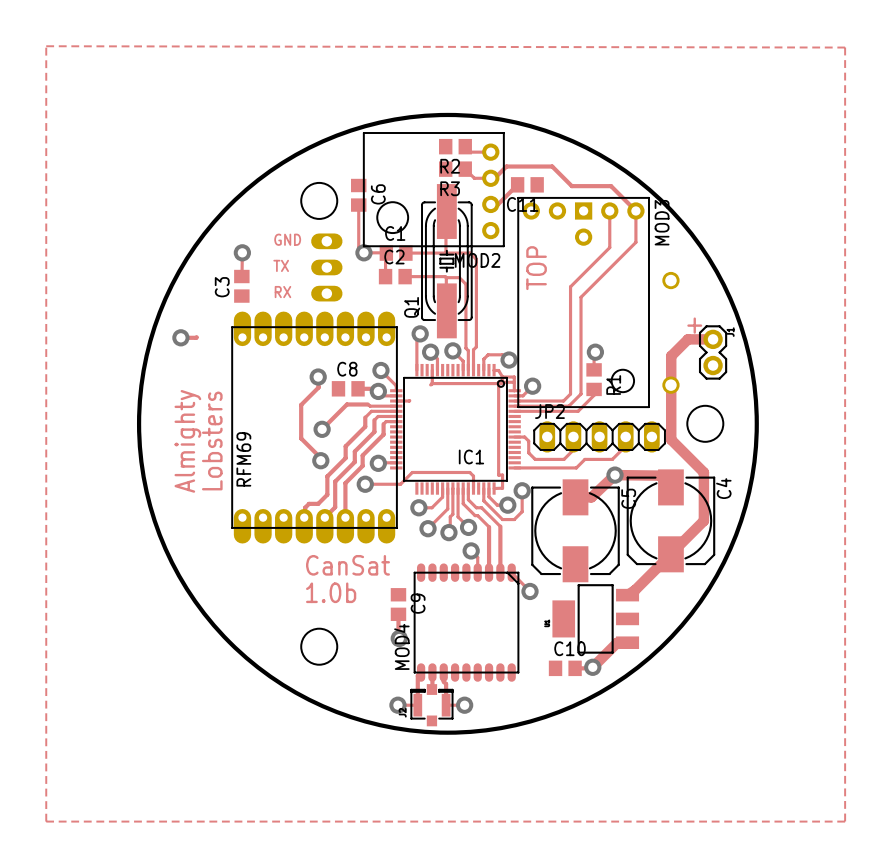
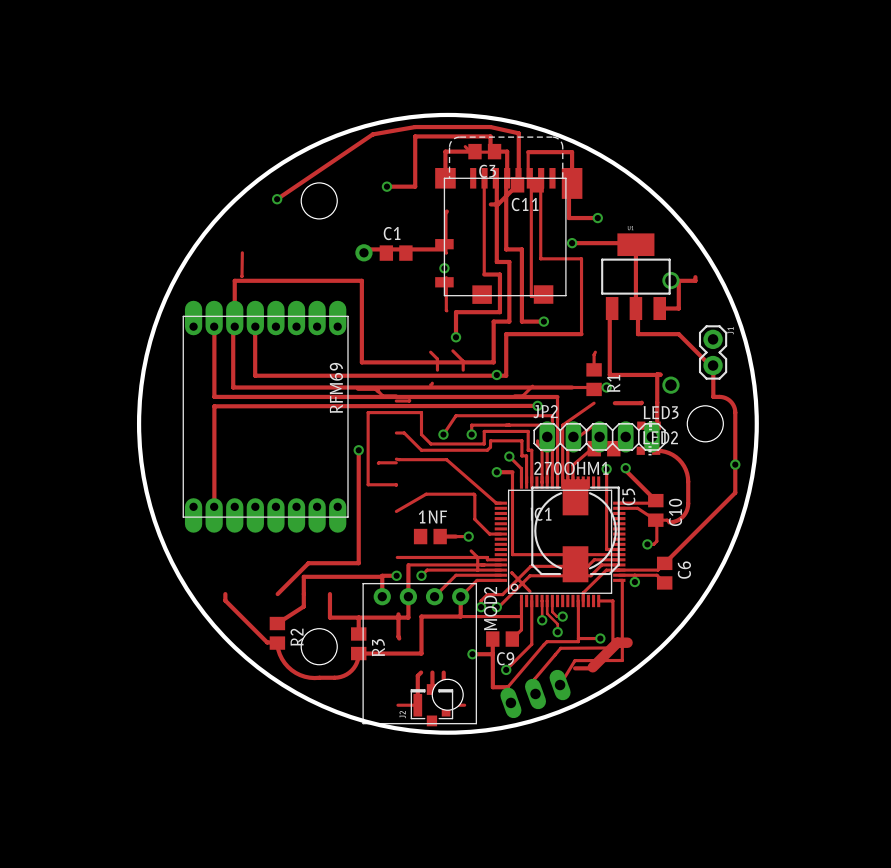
zone outline: (46, 46) (46, 821) (845, 821) (845, 47) (46, 46) -> none
R2 rotation: 0° (455, 146) -> 90° clockwise (277, 633)
R2 position: (455, 146) -> (277, 633)
track: none -> (474, 151) (445, 151) (445, 178) (443, 178)
R2 name position: R2 (450, 166) -> R2 (297, 637)
R3 rotation: 0° (455, 169) -> 90° clockwise (358, 643)
R3 position: (455, 169) -> (358, 643)
track: (465, 169) (474, 178) (484, 178) -> none
track: (484, 178) (494, 178) (506, 166) (552, 166) (571, 186) (611, 186) (635, 210) (635, 242) (581, 297) (581, 394) (568, 406) (514, 406) -> (484, 178) (484, 274) (499, 274) (499, 312) (456, 312) (456, 337)
track: none -> (495, 178) (496, 261) (509, 261) (509, 321) (493, 321) (493, 362) (361, 362) (361, 280) (234, 280) (233, 387) (606, 387)
track: none -> (518, 178) (518, 133) (490, 127) (415, 127) (372, 134) (277, 199)
track: none -> (541, 178) (540, 258) (581, 258) (581, 334) (506, 334) (506, 375) (255, 375) (255, 326)
track: none -> (386, 186) (415, 186) (415, 136) (490, 136) (490, 151) (507, 151) (506, 249) (521, 249) (521, 321) (543, 321)
via: none -> (386, 186)
R3 name position: R3 (450, 188) -> R3 (378, 647)
MOD2 rotation: 0° (433, 189) -> 90° counterclockwise (419, 653)
MOD2 position: (433, 189) -> (419, 653)
C6 position: (358, 195) -> (664, 573)
via: none -> (277, 199)
track: (358, 205) (358, 247) (363, 252) (386, 253) (385, 276) -> none
track: (609, 210) (609, 247) (570, 286) (570, 394) (563, 401) (514, 401) -> none
track: none -> (597, 218) (568, 218) (568, 183) (572, 183) (572, 152) (528, 152) (528, 178) (531, 178) (531, 296) (543, 296) (543, 291)
via: none -> (597, 218)
part: none -> (508, 220)
text: GND (287, 239) -> none
track: none -> (572, 243) (635, 243) (635, 308) (638, 308) (638, 334) (678, 334) (713, 368) (713, 396) (723, 397) (729, 400) (734, 406) (735, 412) (735, 492) (657, 570) (606, 570) (583, 592) (583, 600)
via: none -> (572, 243)
track: none -> (368, 249) (444, 249)
via: (242, 252) -> none
track: (405, 253) (470, 253) (476, 259) (476, 346) (473, 349) (473, 370) -> none
Q1: (446, 261) -> none
text: TX (281, 265) -> none
part: (326, 267) -> none
via: none -> (444, 268)
text: TOP (536, 268) -> none
C2: (395, 276) -> none
track: (405, 276) (459, 277) (465, 284) (465, 348) (468, 350) (468, 370) -> none
track: none -> (695, 277) (695, 280) (678, 280) (678, 308) (659, 308)
C3 rotation: 0° (241, 286) -> 90° clockwise (484, 151)
C3 position: (241, 286) -> (484, 151)
C3 name position: C3 (222, 287) -> C3 (487, 171)
text: RX (282, 292) -> none
MOD3: (583, 302) -> none
track: none -> (612, 308) (609, 308) (609, 374) (660, 374)
via: none -> (543, 321)
text: + (694, 325) -> none
track: none -> (214, 326) (214, 396) (557, 397) (557, 482)
track: (180, 332) (180, 337) (196, 337) -> none
track: (420, 333) (416, 338) (416, 370) -> none
via: (420, 333) -> none
via: (180, 337) -> none
via: none -> (456, 337)
track: (713, 339) (687, 339) (671, 356) (670, 385) -> none
via: (452, 350) -> none
via: (430, 352) -> none
via: (595, 352) -> none
track: (509, 360) (502, 354) (488, 354) (483, 359) (483, 370) -> none
via: (509, 360) -> none
track: (380, 370) (396, 385) (396, 390) -> none
via: (380, 370) -> none
track: (432, 370) (431, 383) (502, 383) (502, 377) -> none
track: (494, 370) (498, 370) (502, 377) -> none
via: none -> (496, 374)
track: none -> (660, 374) (657, 374) (656, 450)
track: (318, 377) (318, 387) (301, 404) (301, 438) (319, 456) (320, 460) -> none
via: (318, 377) -> none
track: (502, 377) (514, 377) (514, 390) -> none
track: (514, 382) (498, 382) (498, 475) (502, 475) (502, 488) (494, 488) -> none
track: (671, 385) (671, 439) (703, 472) (703, 520) (635, 589) (627, 595) -> none
via: (532, 386) -> none
via: none -> (606, 387)
C8: (348, 388) -> none
track: (594, 389) (594, 395) (578, 411) (514, 411) -> none
via: (378, 391) -> none
track: none -> (641, 402) (614, 403)
track: none -> (594, 403) (562, 425) (562, 482)
track: none -> (537, 405) (214, 406) (214, 506)
via: none -> (537, 405)
track: (396, 406) (346, 404) (322, 429) -> none
track: (396, 411) (371, 411) (365, 417) (365, 426) (345, 446) (345, 458) (327, 476) (327, 494) (318, 503) (309, 503) (305, 507) (304, 517) -> none
part: none -> (265, 416)
track: (396, 416) (378, 416) (374, 420) (374, 431) (354, 451) (354, 462) (335, 481) (335, 507) (324, 517) -> none
track: (396, 421) (386, 421) (383, 424) (383, 434) (362, 455) (362, 465) (345, 483) (345, 517) -> none
track: none -> (594, 425) (567, 445) (567, 482)
LED3: none -> (648, 425)
part: (314, 427) -> none
via: (322, 429) -> none
IC1 rotation: 0° (455, 429) -> 180° (560, 541)
IC1 position: (455, 429) -> (560, 541)
track: none -> (396, 432) (404, 432) (421, 450) (487, 450) (490, 447) (490, 440) (521, 440) (521, 455) (526, 455) (526, 482)
track: none -> (443, 434) (456, 415) (552, 415) (552, 482)
via: none -> (443, 434)
track: none -> (471, 434) (471, 425) (547, 425) (547, 482)
via: none -> (471, 434)
track: (573, 436) (573, 450) (564, 459) (535, 459) (528, 452) (528, 441) (524, 437) (514, 437) -> none
track: (625, 436) (625, 446) (612, 459) (584, 459) (576, 467) (514, 467) -> none
text: Lobsters (212, 440) -> none
track: none -> (537, 440) (537, 445) (542, 445) (542, 482)
text: Almighty (187, 441) -> none
track: none -> (594, 447) (572, 465) (572, 482)
270OHM1: none -> (604, 448)
track: none -> (358, 450) (358, 563) (308, 563) (277, 594)
via: none -> (358, 450)
LED2: none -> (648, 450)
track: none -> (656, 450) (672, 454) (684, 466) (687, 477) (688, 503) (685, 513) (678, 519) (669, 522) (667, 520) (655, 520)
track: none -> (509, 456) (521, 468) (521, 482)
via: none -> (509, 456)
track: none -> (396, 459) (446, 459) (496, 503) (500, 503)
via: (320, 460) -> none
via: (378, 463) -> none
via: none -> (735, 464)
track: none -> (625, 468) (625, 470) (655, 500) (653, 503) (619, 503)
via: none -> (625, 468)
track: none -> (606, 469) (606, 549) (619, 549)
via: none -> (606, 469)
track: none -> (496, 472) (512, 472) (512, 554) (619, 554)
via: none -> (496, 472)
via: (615, 475) -> none
track: none -> (531, 482) (531, 450) (528, 450) (528, 431) (484, 431) (484, 443) (430, 443) (421, 434) (421, 412) (368, 412) (368, 484) (396, 485)
track: (365, 484) (400, 484) (412, 472) (469, 472) (473, 476) (473, 488) -> none
via: (365, 484) -> none
track: (670, 486) (659, 475) (615, 475) (591, 497) (575, 497) -> none
track: (442, 488) (442, 497) (431, 507) (418, 507) -> none
track: (447, 488) (447, 508) (428, 528) -> none
track: (452, 488) (452, 514) (450, 516) (448, 532) -> none
track: (458, 488) (458, 516) (468, 527) -> none
track: (463, 488) (463, 503) (489, 526) (489, 572) -> none
track: (468, 488) (468, 499) (476, 507) (481, 507) (500, 526) (500, 572) -> none
track: (483, 488) (483, 500) (502, 519) (514, 519) (522, 511) (522, 490) -> none
track: (488, 488) (488, 496) (497, 505) (507, 505) -> none
via: (522, 490) -> none
via: (507, 505) -> none
via: (418, 507) -> none
track: none -> (619, 508) (637, 508) (655, 520)
track: none -> (396, 511) (426, 494) (473, 494) (474, 519) (489, 534) (500, 534)
via size: [459, 518, 478, 537] -> [463, 531, 474, 542]
track: none -> (655, 520) (656, 541) (653, 544) (647, 544)
C4: (670, 520) -> none
via: (428, 528) -> none
via: (448, 532) -> none
1NF: none -> (430, 536)
track: none -> (440, 536) (468, 536)
via: none -> (647, 544)
via: (471, 550) -> none
track: none -> (397, 557) (487, 557) (487, 559) (500, 559)
track: none -> (619, 559) (594, 559) (587, 566) (530, 566) (502, 594) (487, 594) (481, 600) (481, 607)
track: none -> (500, 564) (408, 564) (408, 617) (329, 617) (329, 594)
track: none -> (619, 564) (601, 564) (590, 575) (530, 575) (496, 607)
text: CanSat (348, 565) -> none
track: none -> (500, 570) (427, 570) (421, 575)
track: none -> (396, 575) (382, 575) (382, 596)
via: none -> (396, 575)
via: none -> (421, 575)
track: none -> (500, 575) (456, 575) (434, 596)
track: none -> (619, 575) (656, 575) (666, 585)
track: none -> (382, 576) (303, 576) (303, 606) (277, 623)
track: none -> (500, 580) (477, 580) (460, 596) (460, 616)
track: none -> (619, 580) (622, 580) (622, 660) (574, 660) (560, 685)
via: none -> (634, 582)
via: (530, 591) -> none
text: 1.0b (331, 592) -> none
track: none -> (225, 594) (225, 600) (267, 642) (277, 643) (279, 654) (287, 666) (295, 672) (309, 677) (343, 675) (353, 668) (358, 653) (421, 653) (421, 616) (460, 616)
track: none -> (521, 600) (521, 629) (512, 639)
track: none -> (531, 600) (531, 644) (506, 669)
track: none -> (547, 600) (547, 613) (557, 624) (557, 632)
track: none -> (552, 600) (552, 611) (556, 616) (562, 616)
track: none -> (578, 600) (578, 641) (547, 641) (507, 687)
track: none -> (598, 600) (612, 600) (612, 647) (560, 648) (534, 679) (534, 696) (535, 693)
track: none -> (542, 601) (542, 620)
C9 rotation: 0° (398, 604) -> 90° clockwise (502, 639)
C9 position: (398, 604) -> (502, 639)
via: none -> (481, 607)
via: none -> (496, 607)
track: none -> (460, 616) (521, 616)
via: none -> (562, 616)
track: none -> (358, 617) (358, 633)
part rotation: 0° (595, 618) -> 90° clockwise (635, 276)
part position: (595, 618) -> (635, 276)
via: none -> (542, 620)
MOD4: (466, 622) -> none
via: none -> (557, 632)
via: (399, 638) -> none
track: none -> (578, 638) (600, 638)
via: none -> (600, 638)
track: none -> (492, 639) (492, 687) (507, 687)
track: none -> (472, 654) (492, 654)
via: none -> (472, 654)
via: (592, 667) -> none
C10 rotation: 0° (565, 668) -> 90° clockwise (655, 510)
C10 position: (565, 668) -> (655, 510)
via: none -> (506, 669)
part: none -> (535, 693)
via: (397, 705) -> none
via: (464, 705) -> none

